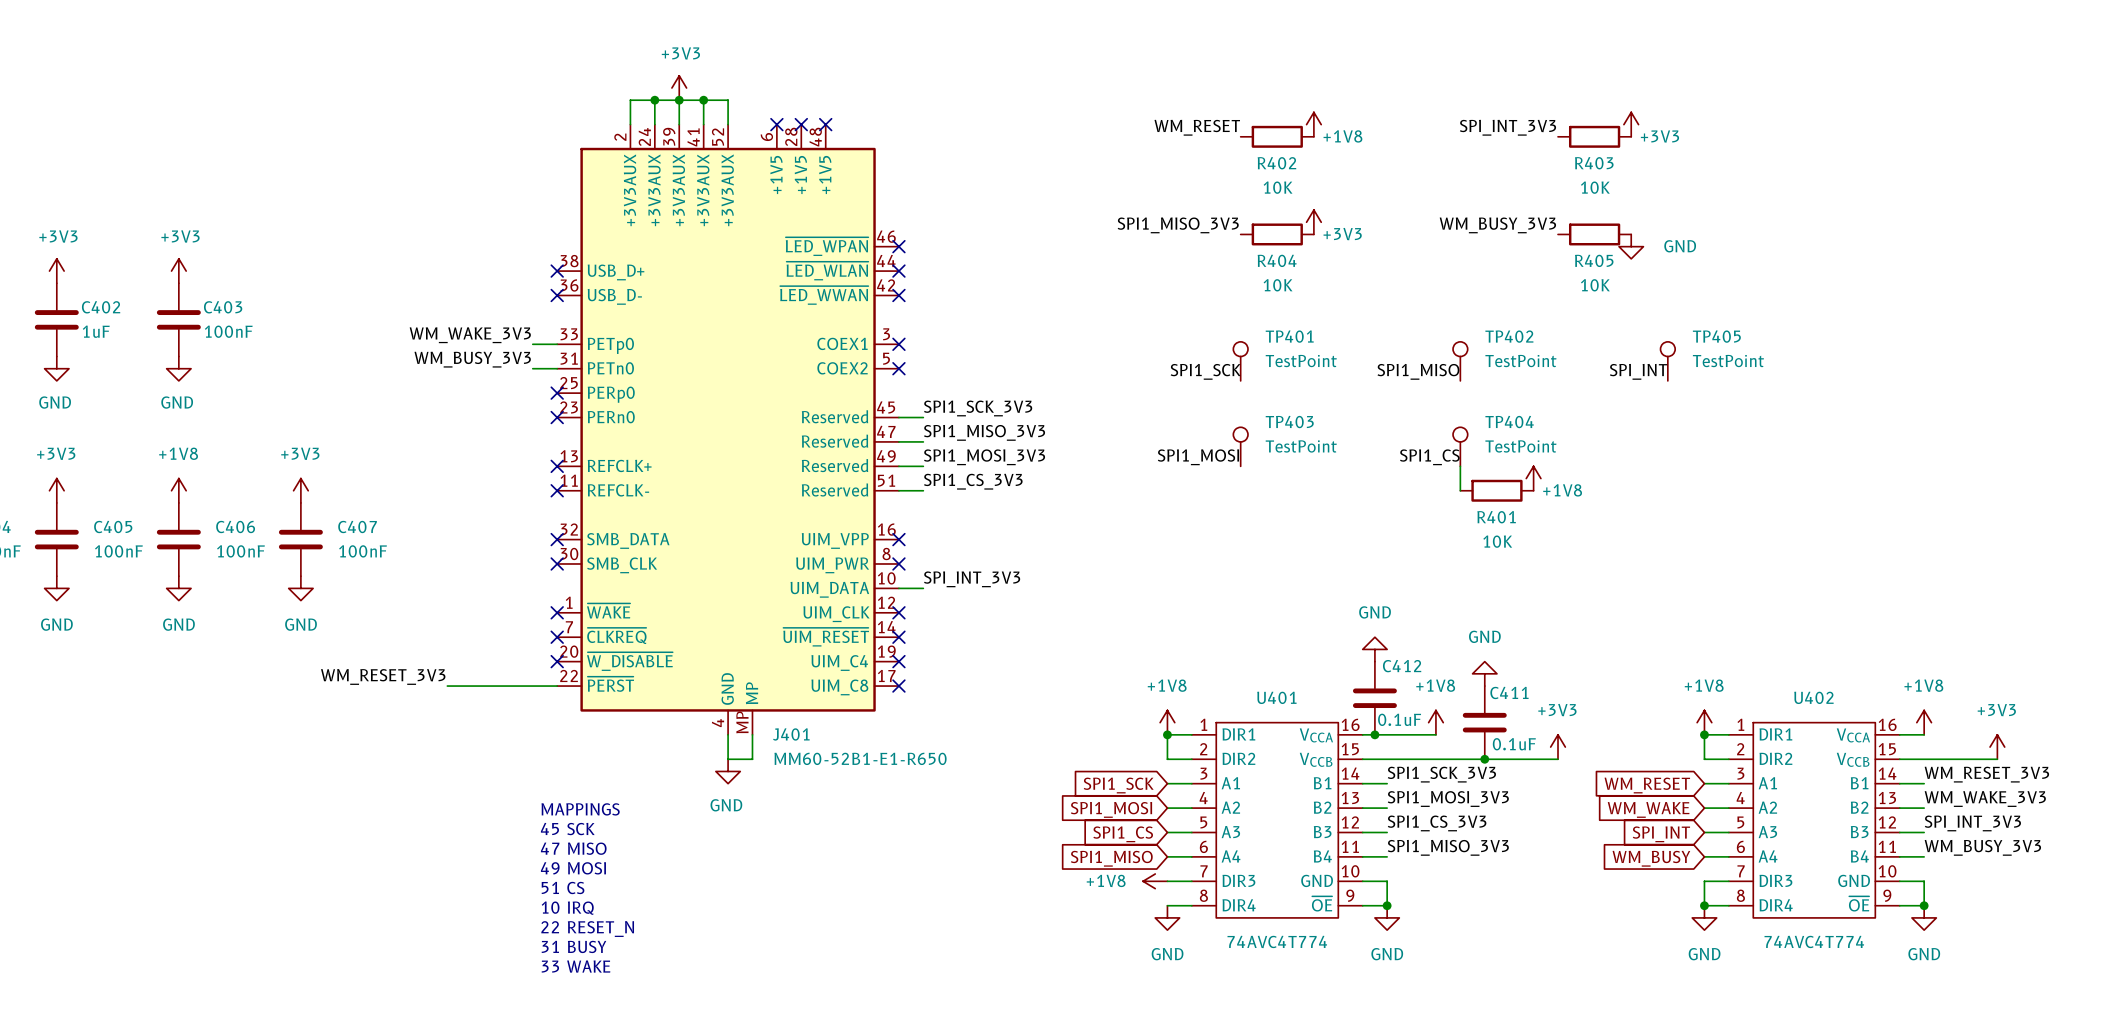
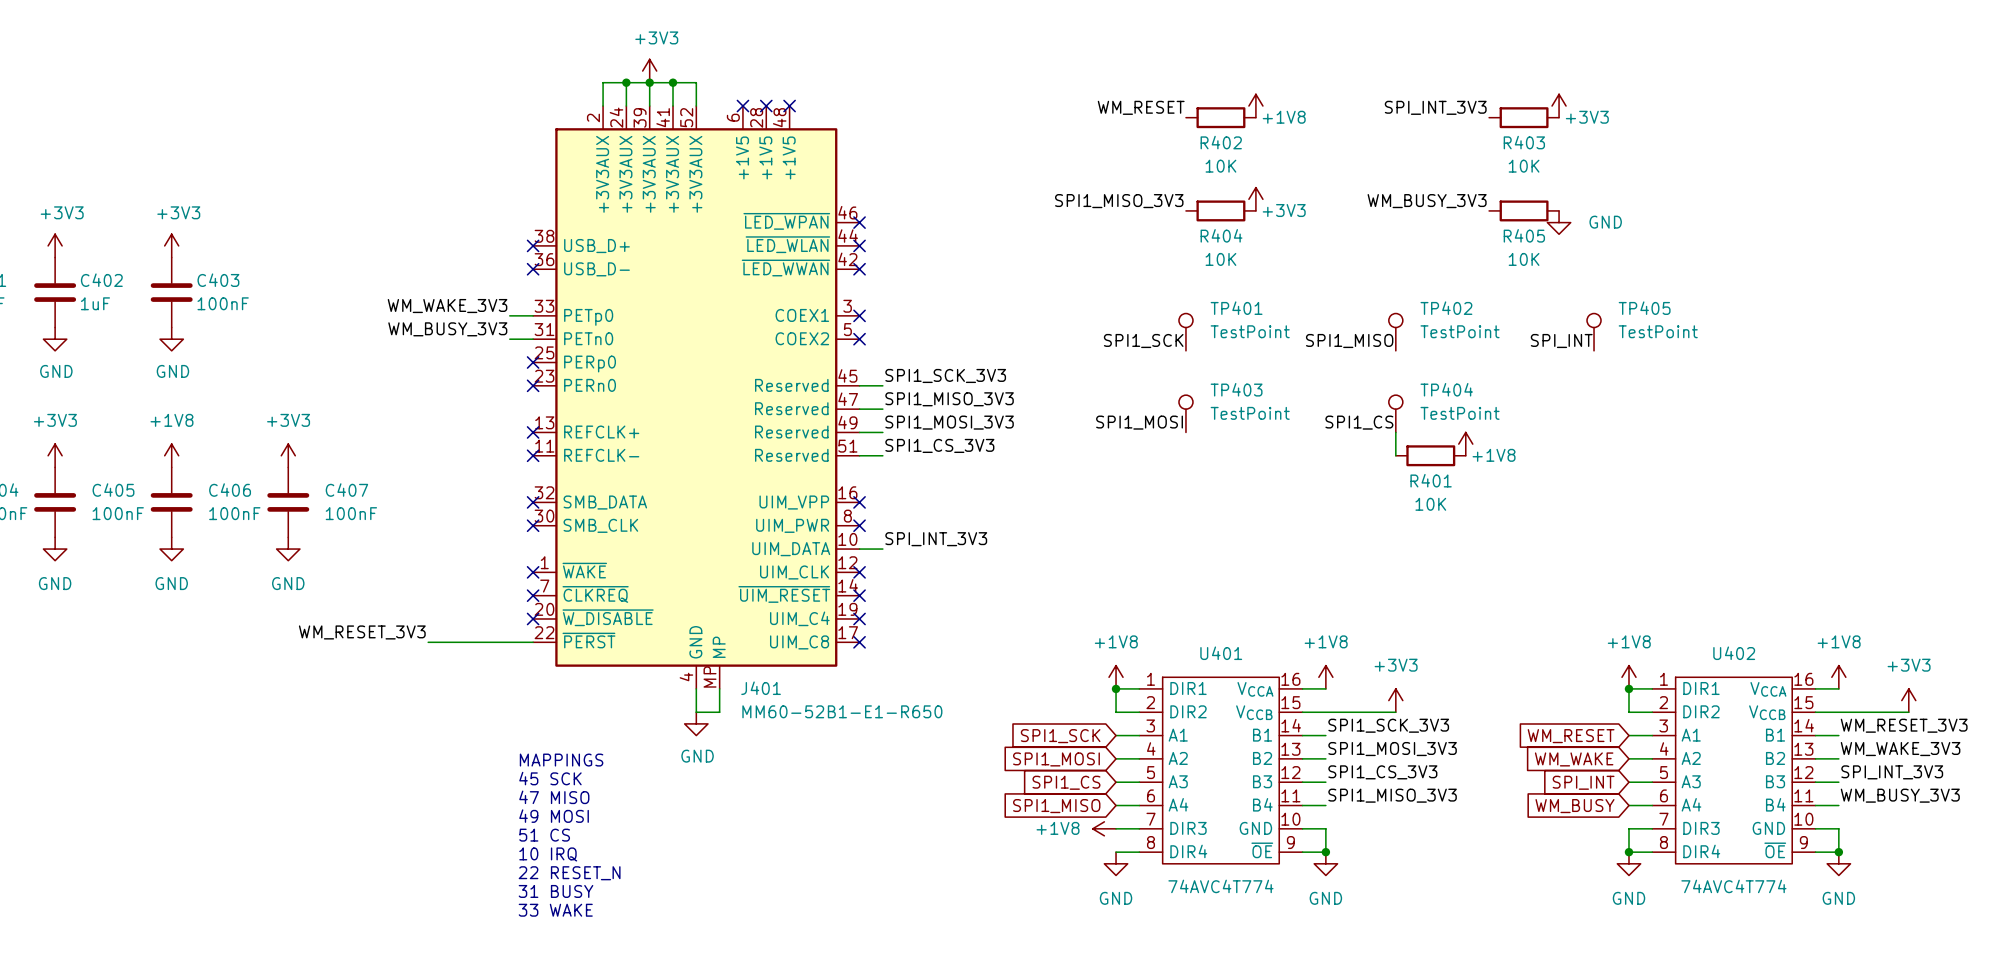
power symbol: GND (1374, 649) -> none
power symbol: GND (1484, 673) -> none
C412: 0.1uF (1374, 698) -> none
power symbol position: +1V8 (1435, 722) -> +1V8 (1325, 677)
C411: 0.1uF (1484, 722) -> none
junction: (1374, 734) -> none
wire: (1387, 734) (1435, 734) -> none
power symbol position: +3V3 (1558, 747) -> +3V3 (1395, 700)
wire: (1460, 759) (1558, 759) -> none
junction: (1484, 759) -> none

